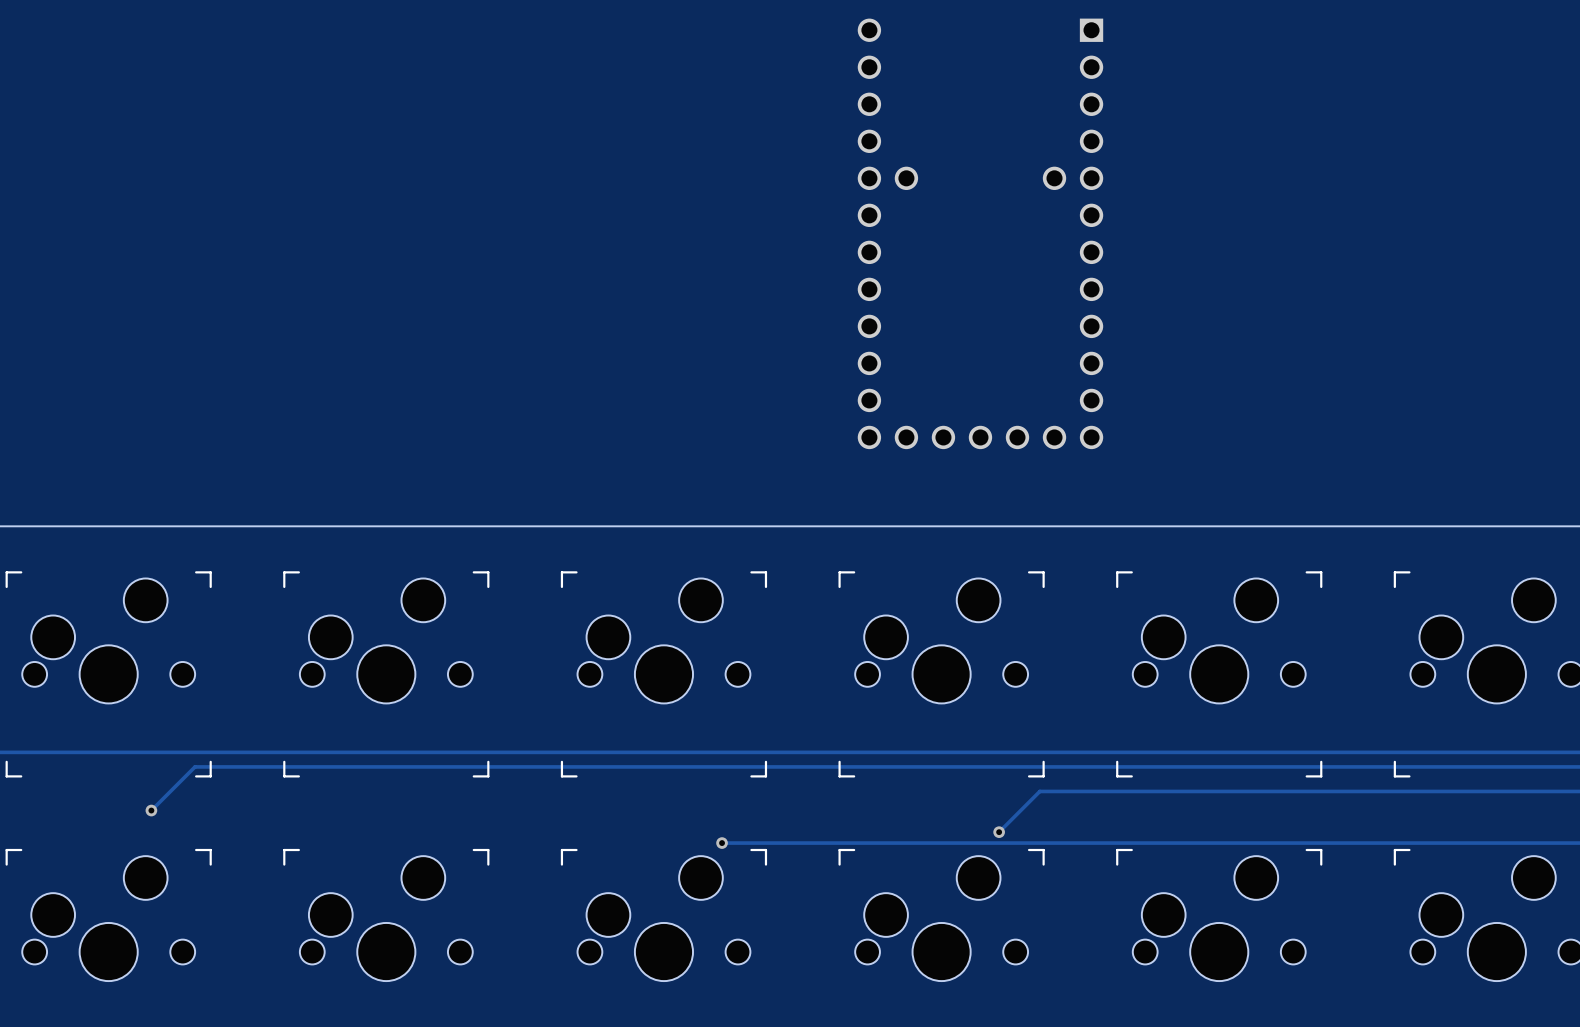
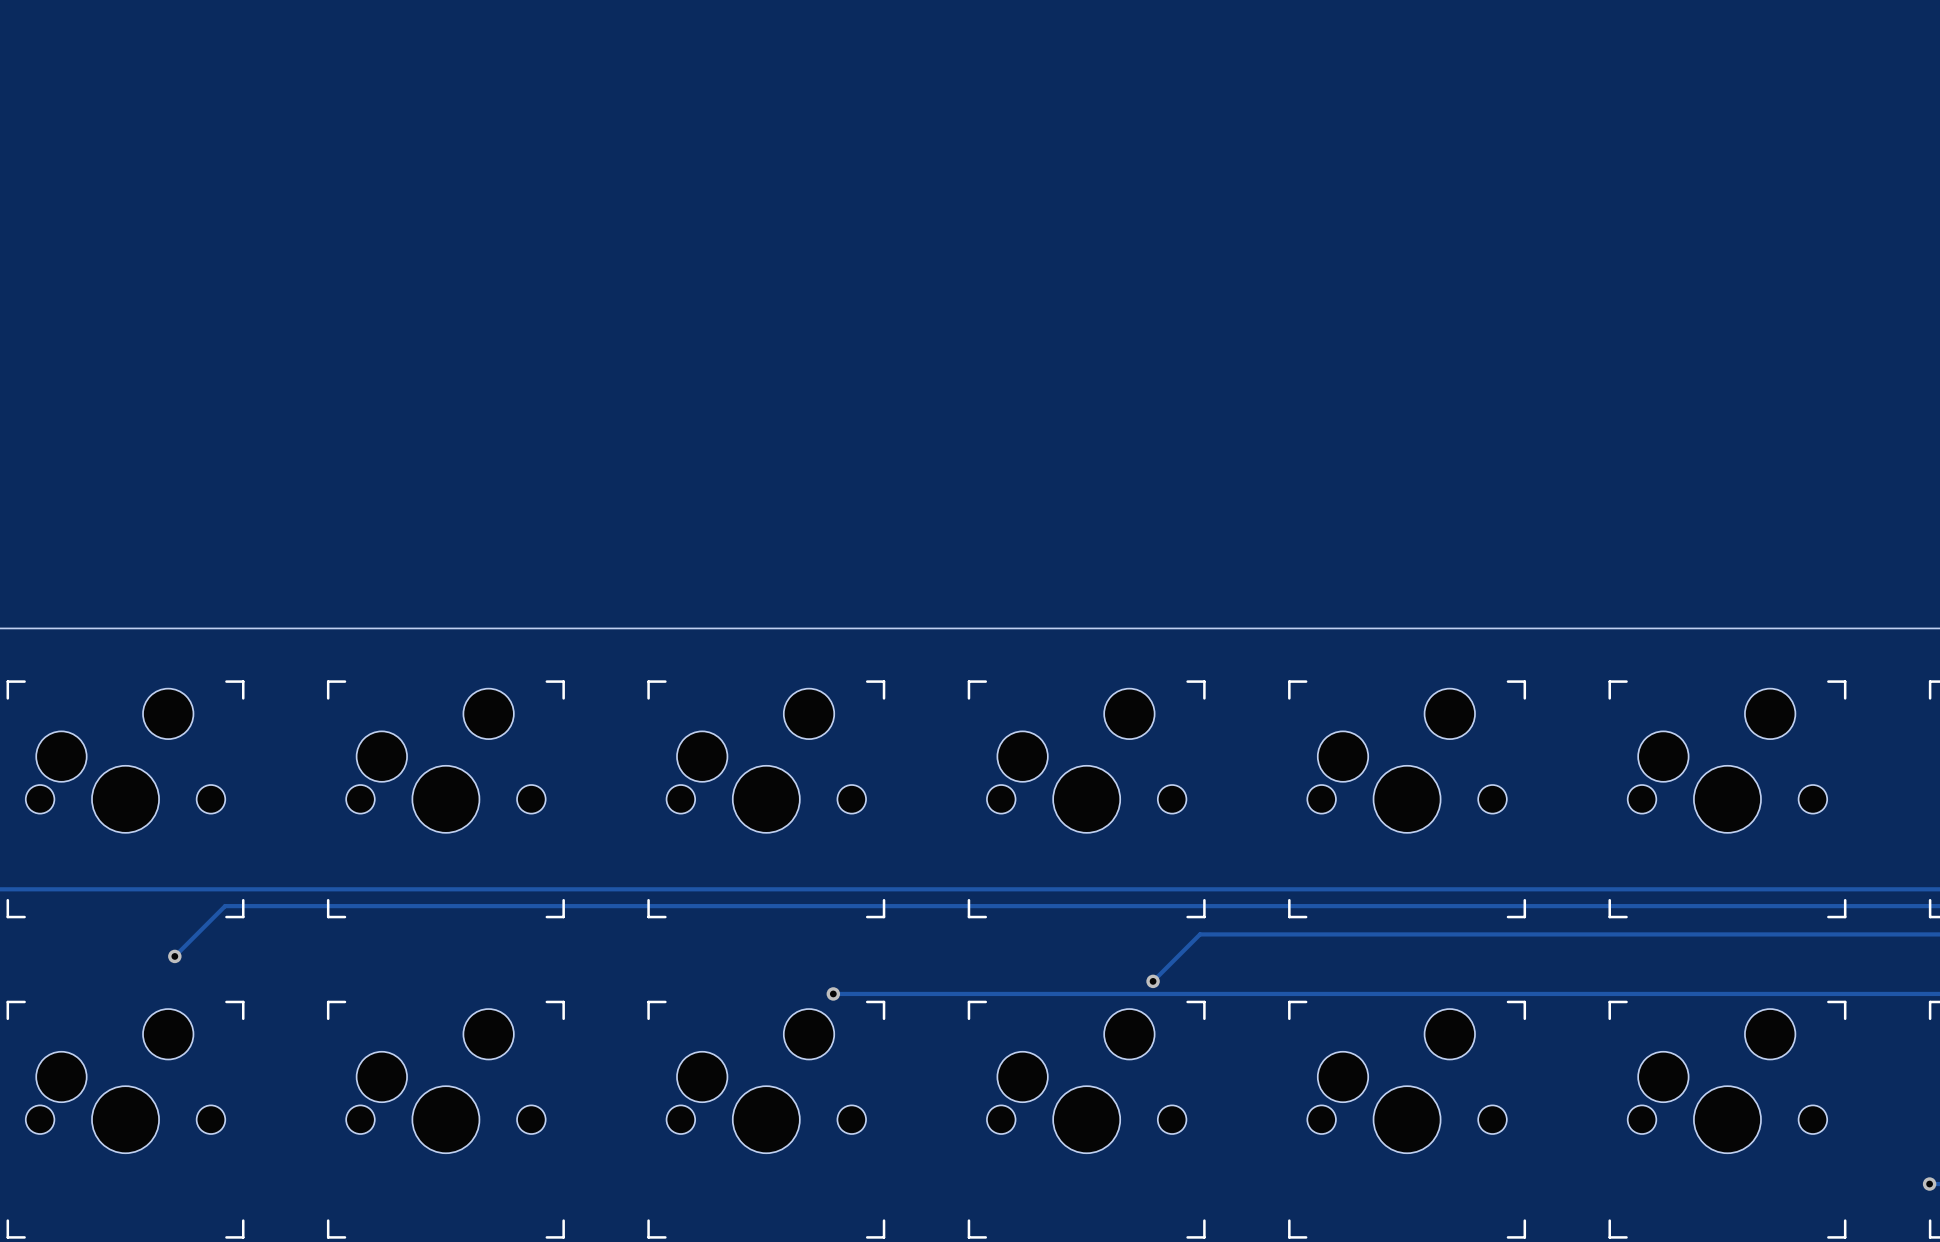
part: (980, 233) -> none

